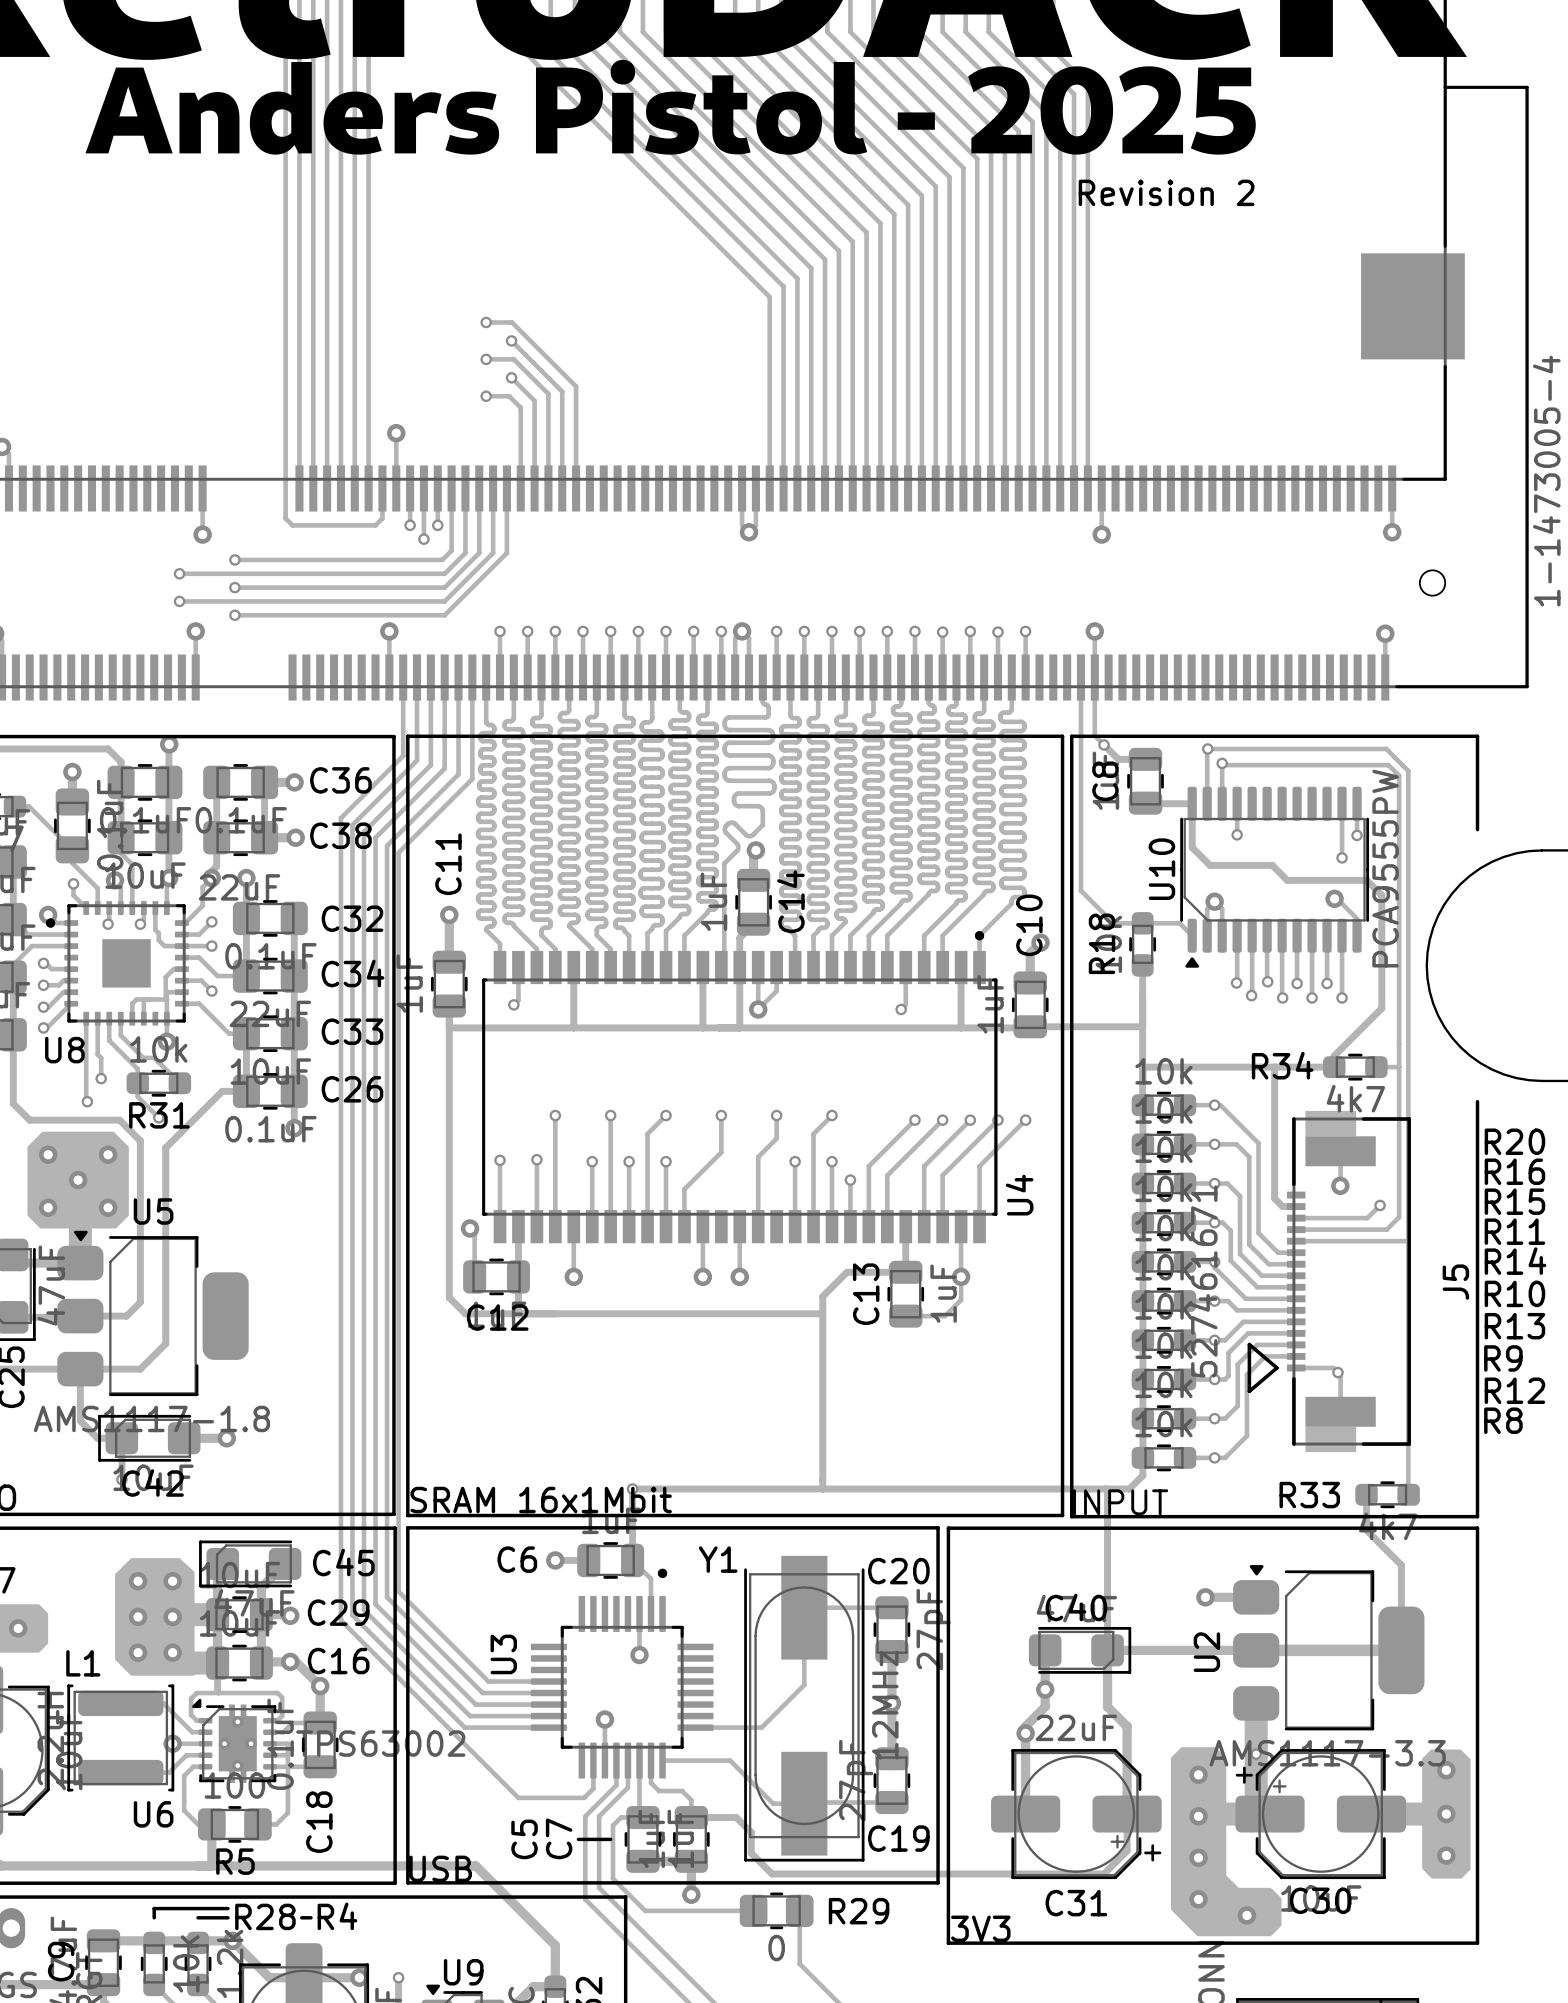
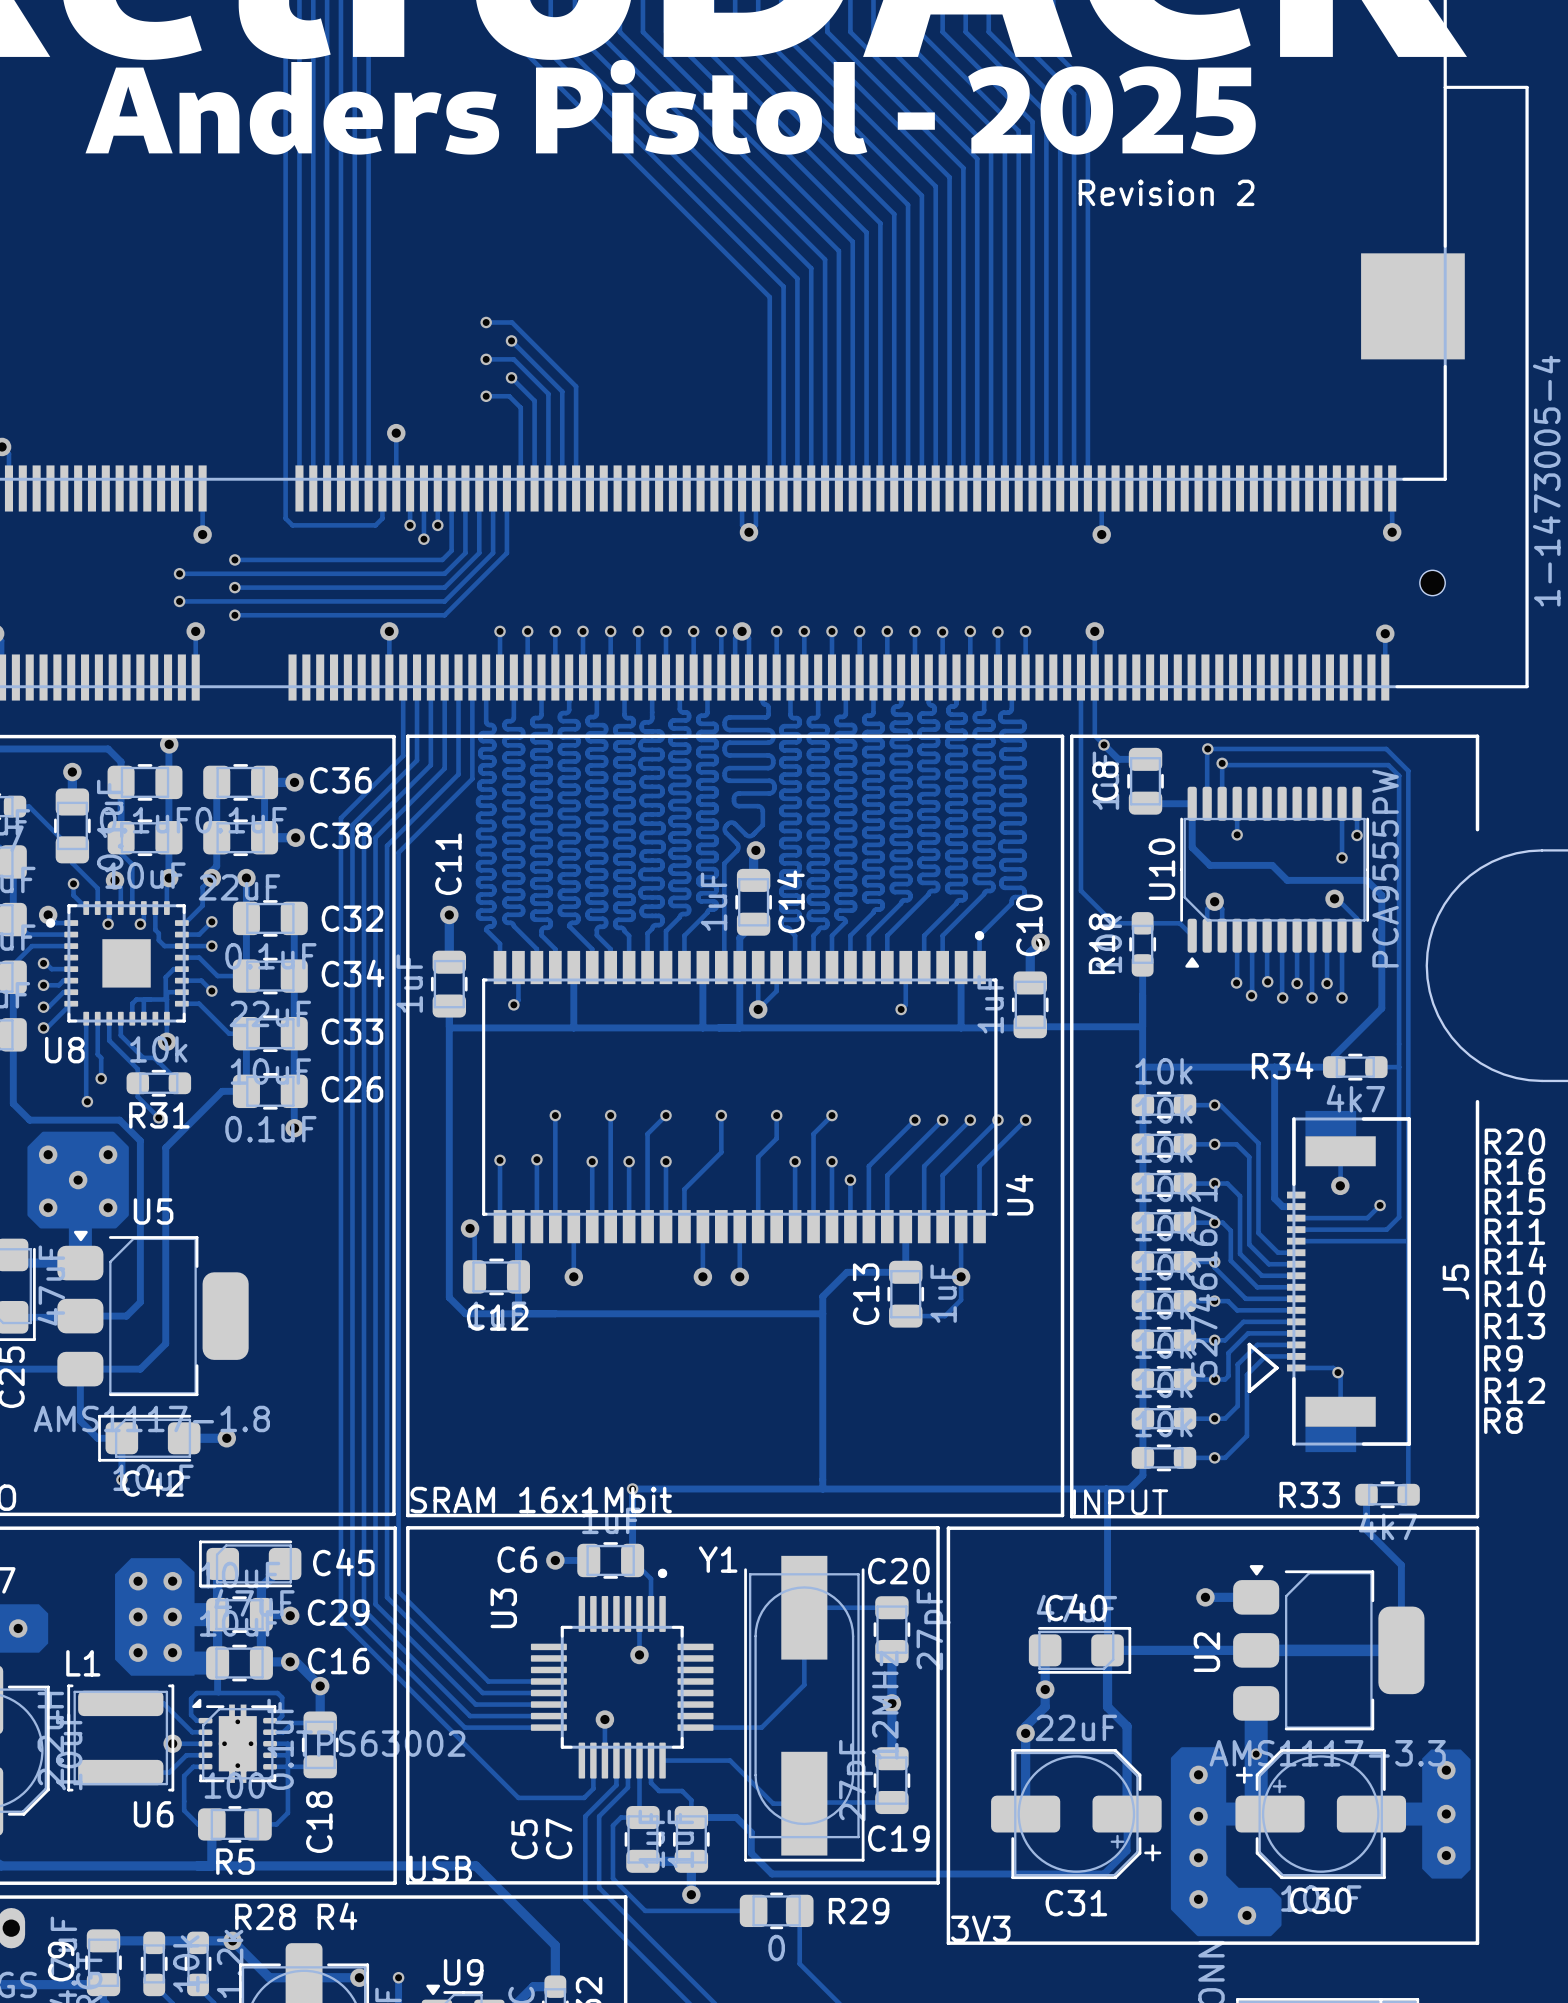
U3 name position: U3 (503, 1654) -> U3 (503, 1608)
line: (578, 1839) (610, 1839) -> none
line: (227, 1908) (154, 1908) (154, 1917) -> none
line: (198, 1917) (227, 1917) -> none
line: (301, 1917) (310, 1917) -> none

